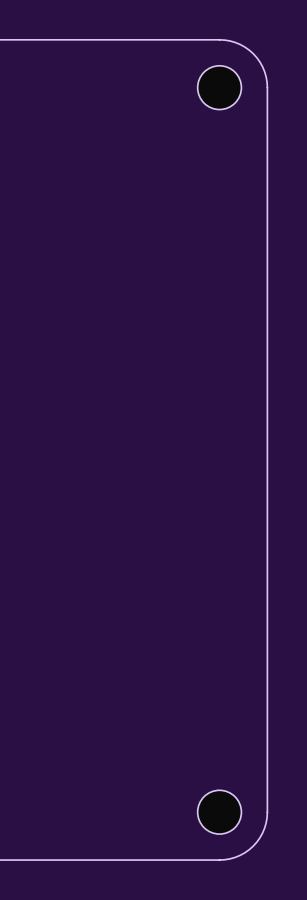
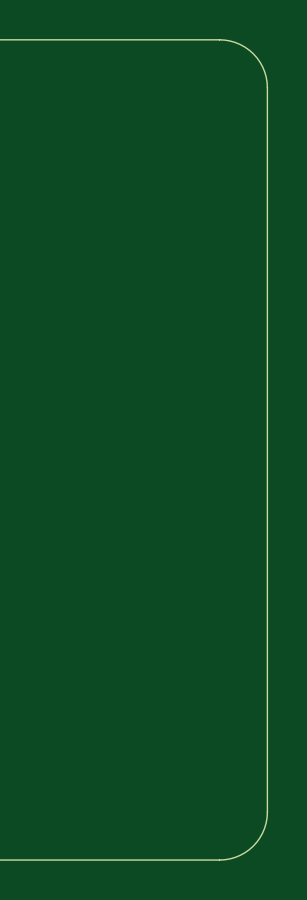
part: (219, 87) -> none
part: (219, 812) -> none

